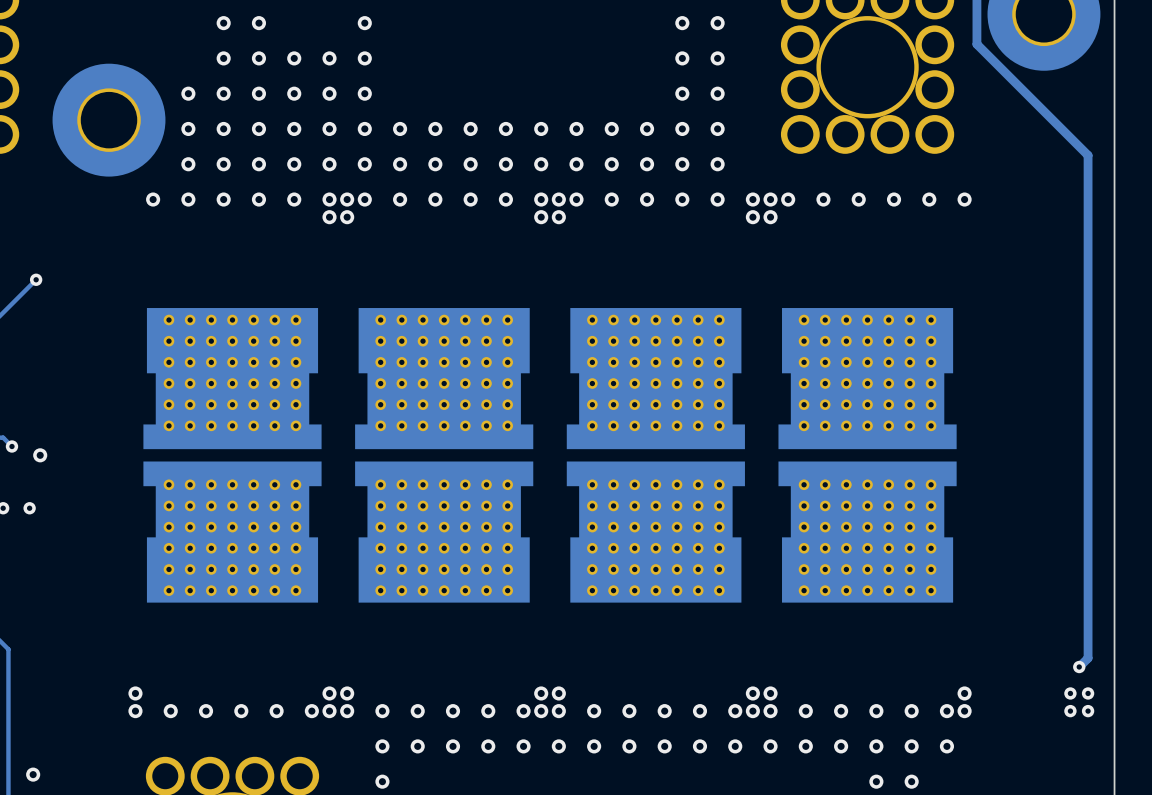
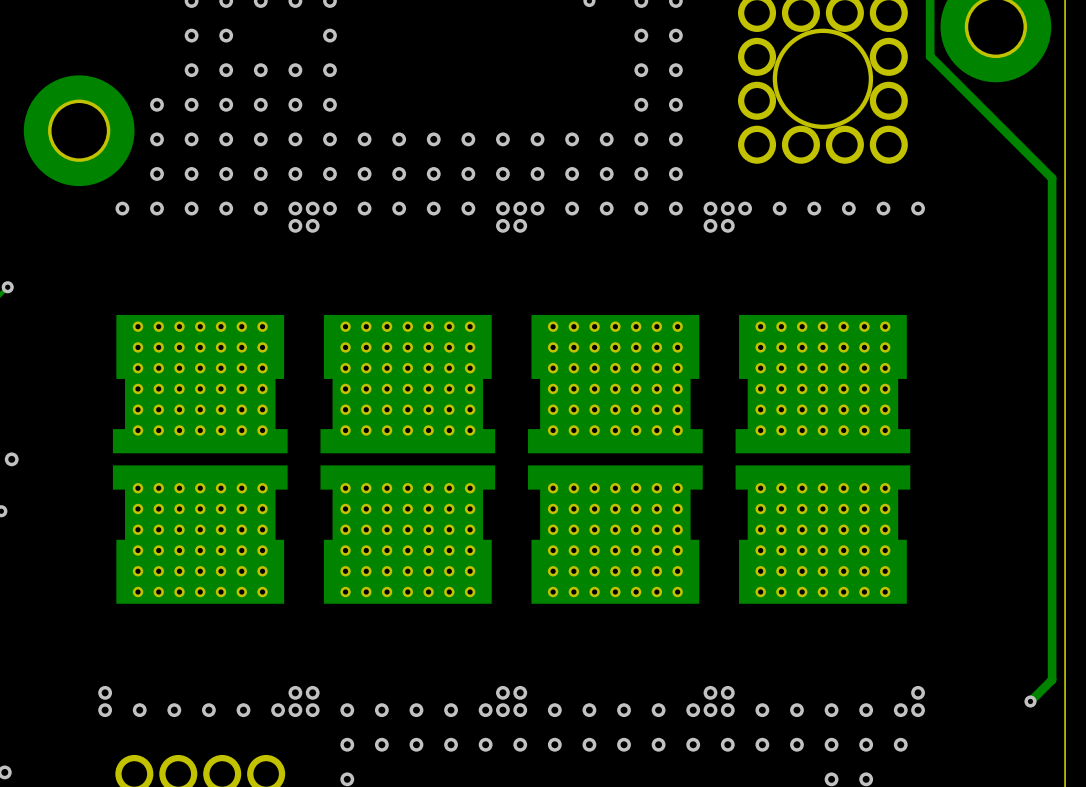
track: (1088, 155) (1088, 658) (1079, 667) -> (1039, 165) (1052, 178) (1052, 679) (1030, 701)
via: (1079, 667) -> none
via: (1070, 693) -> none
via: (1088, 693) -> none
via: none -> (1030, 701)
via: (1070, 711) -> none
via: (1088, 711) -> none

